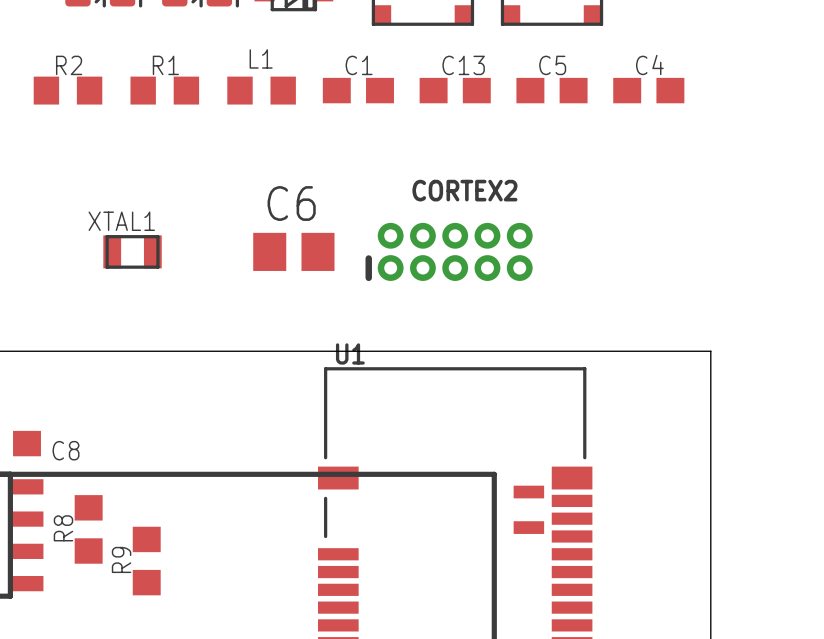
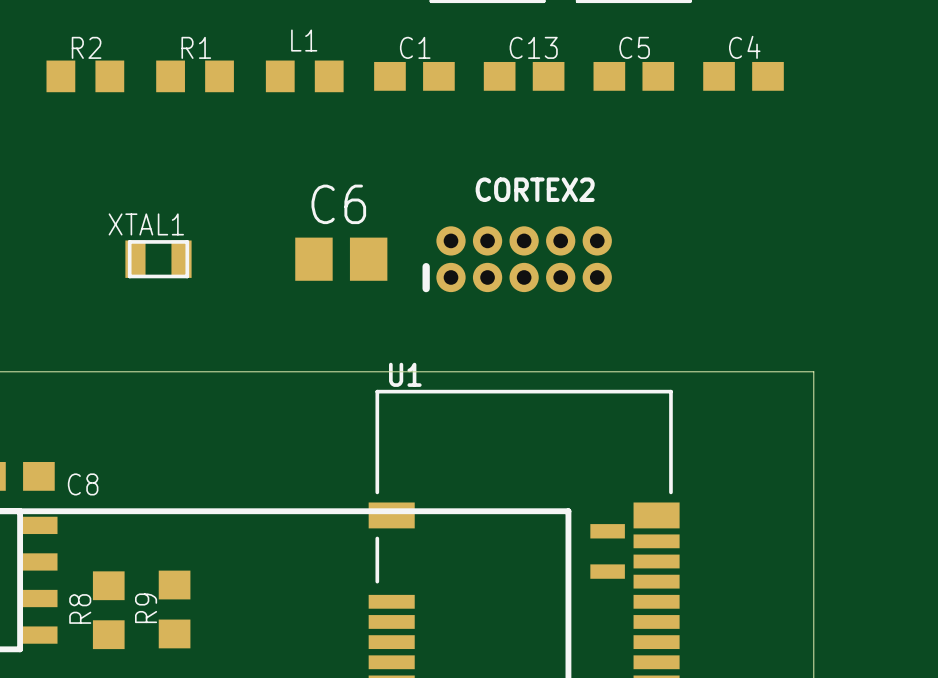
R8 position: (88, 529) -> (108, 610)

